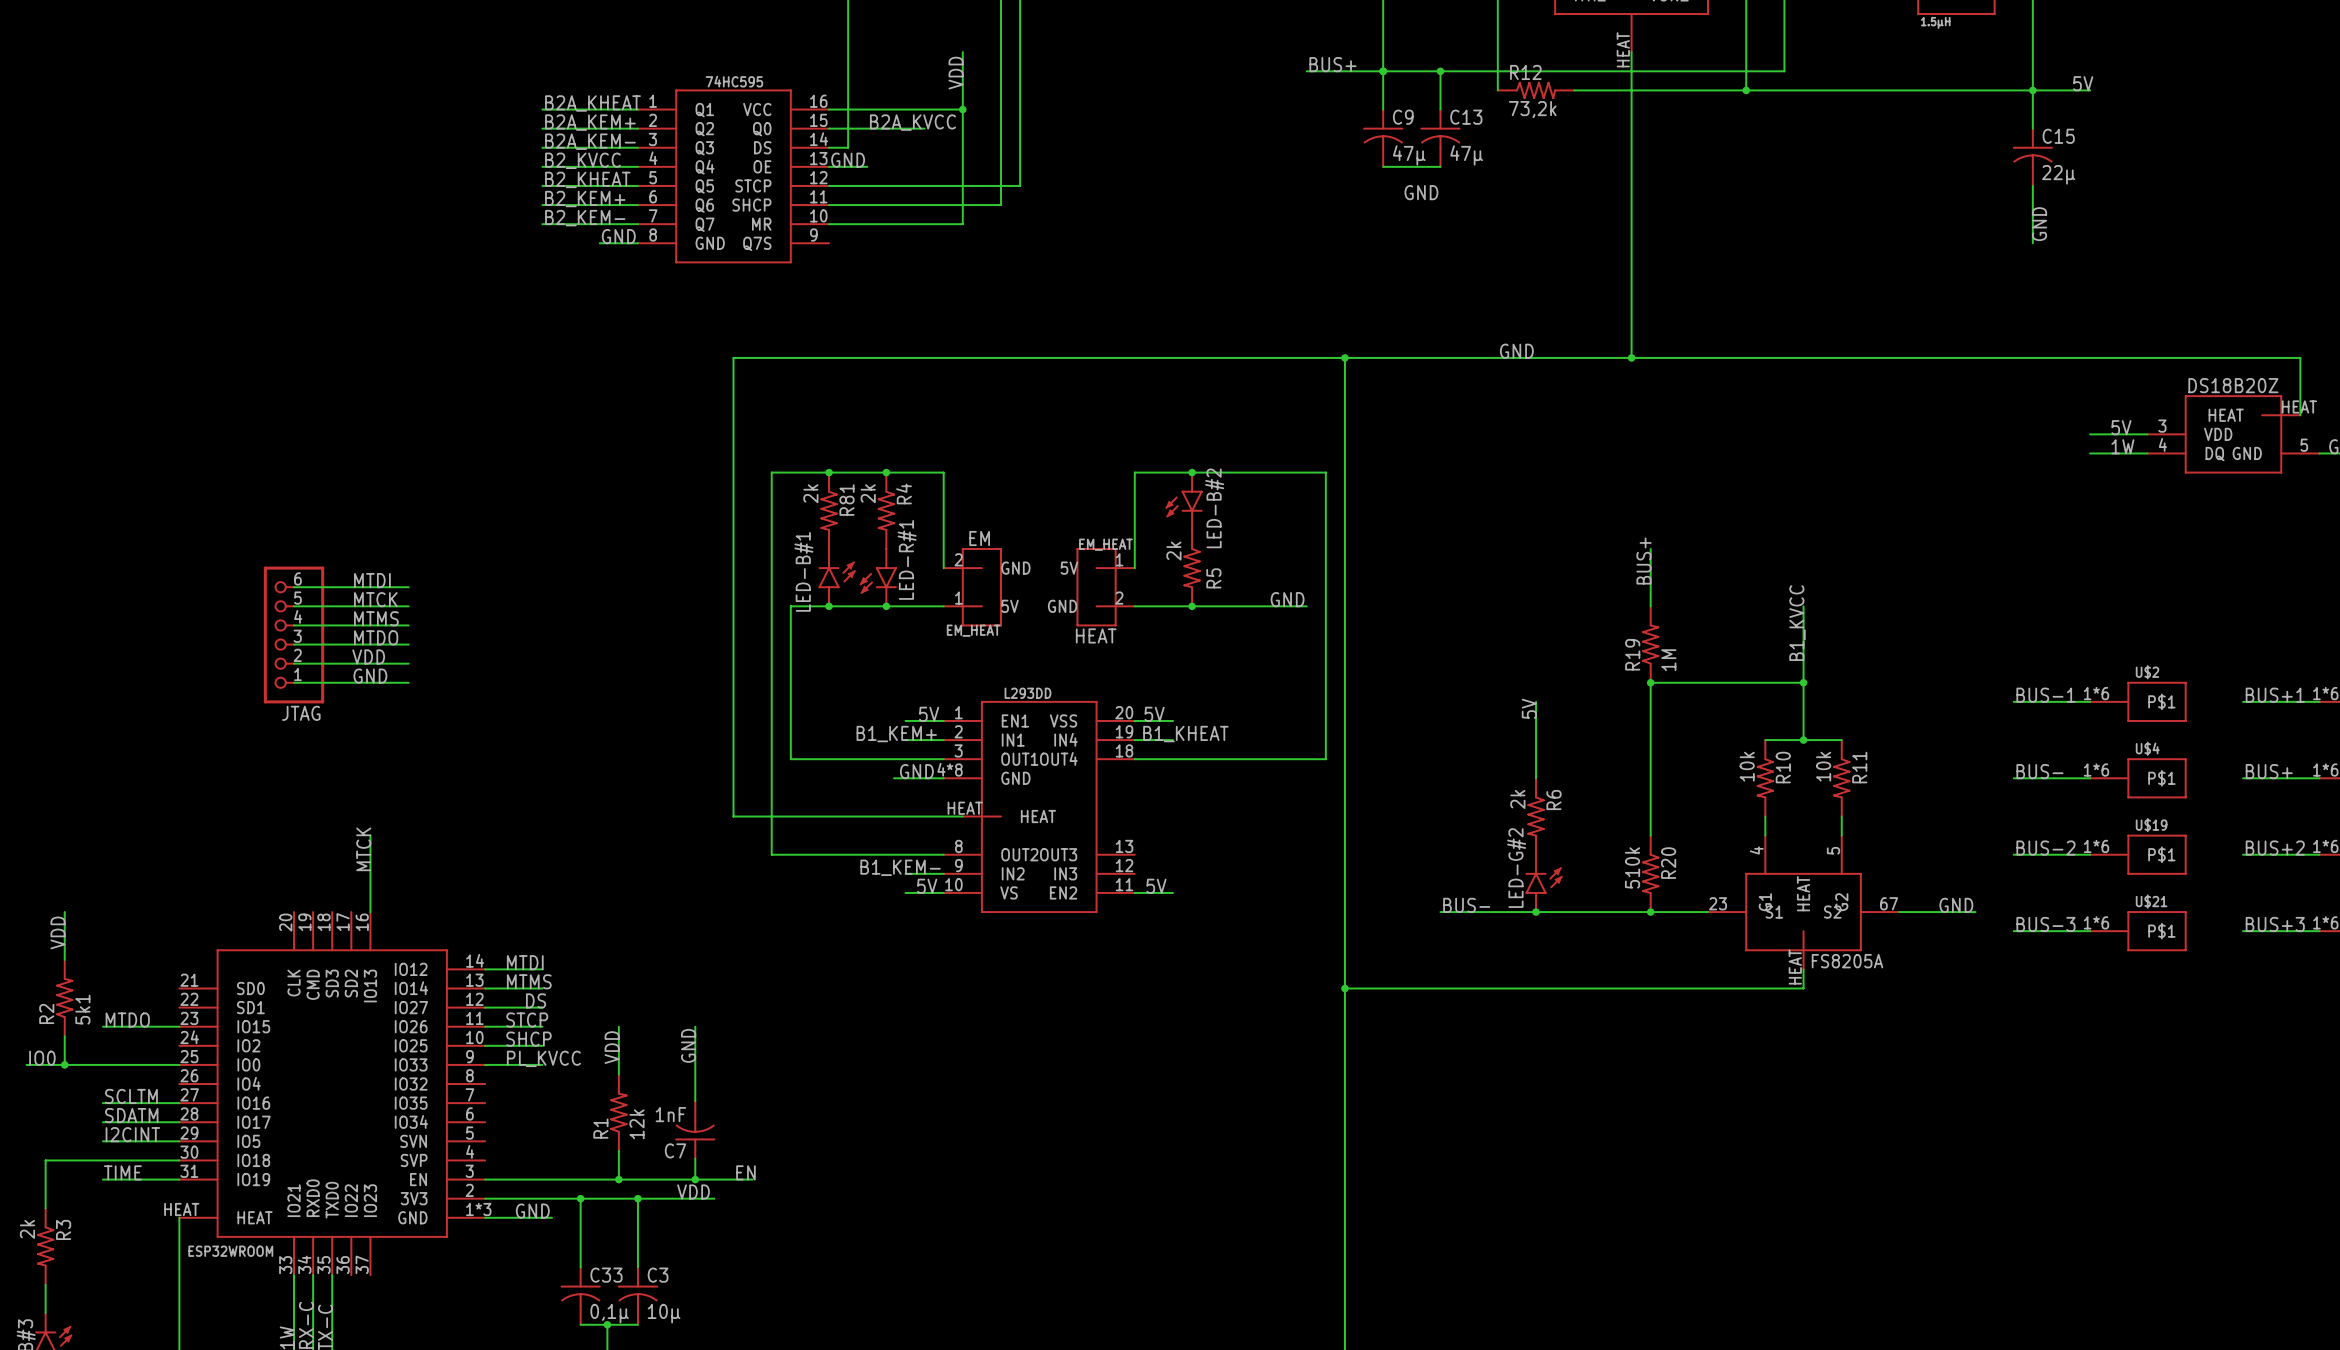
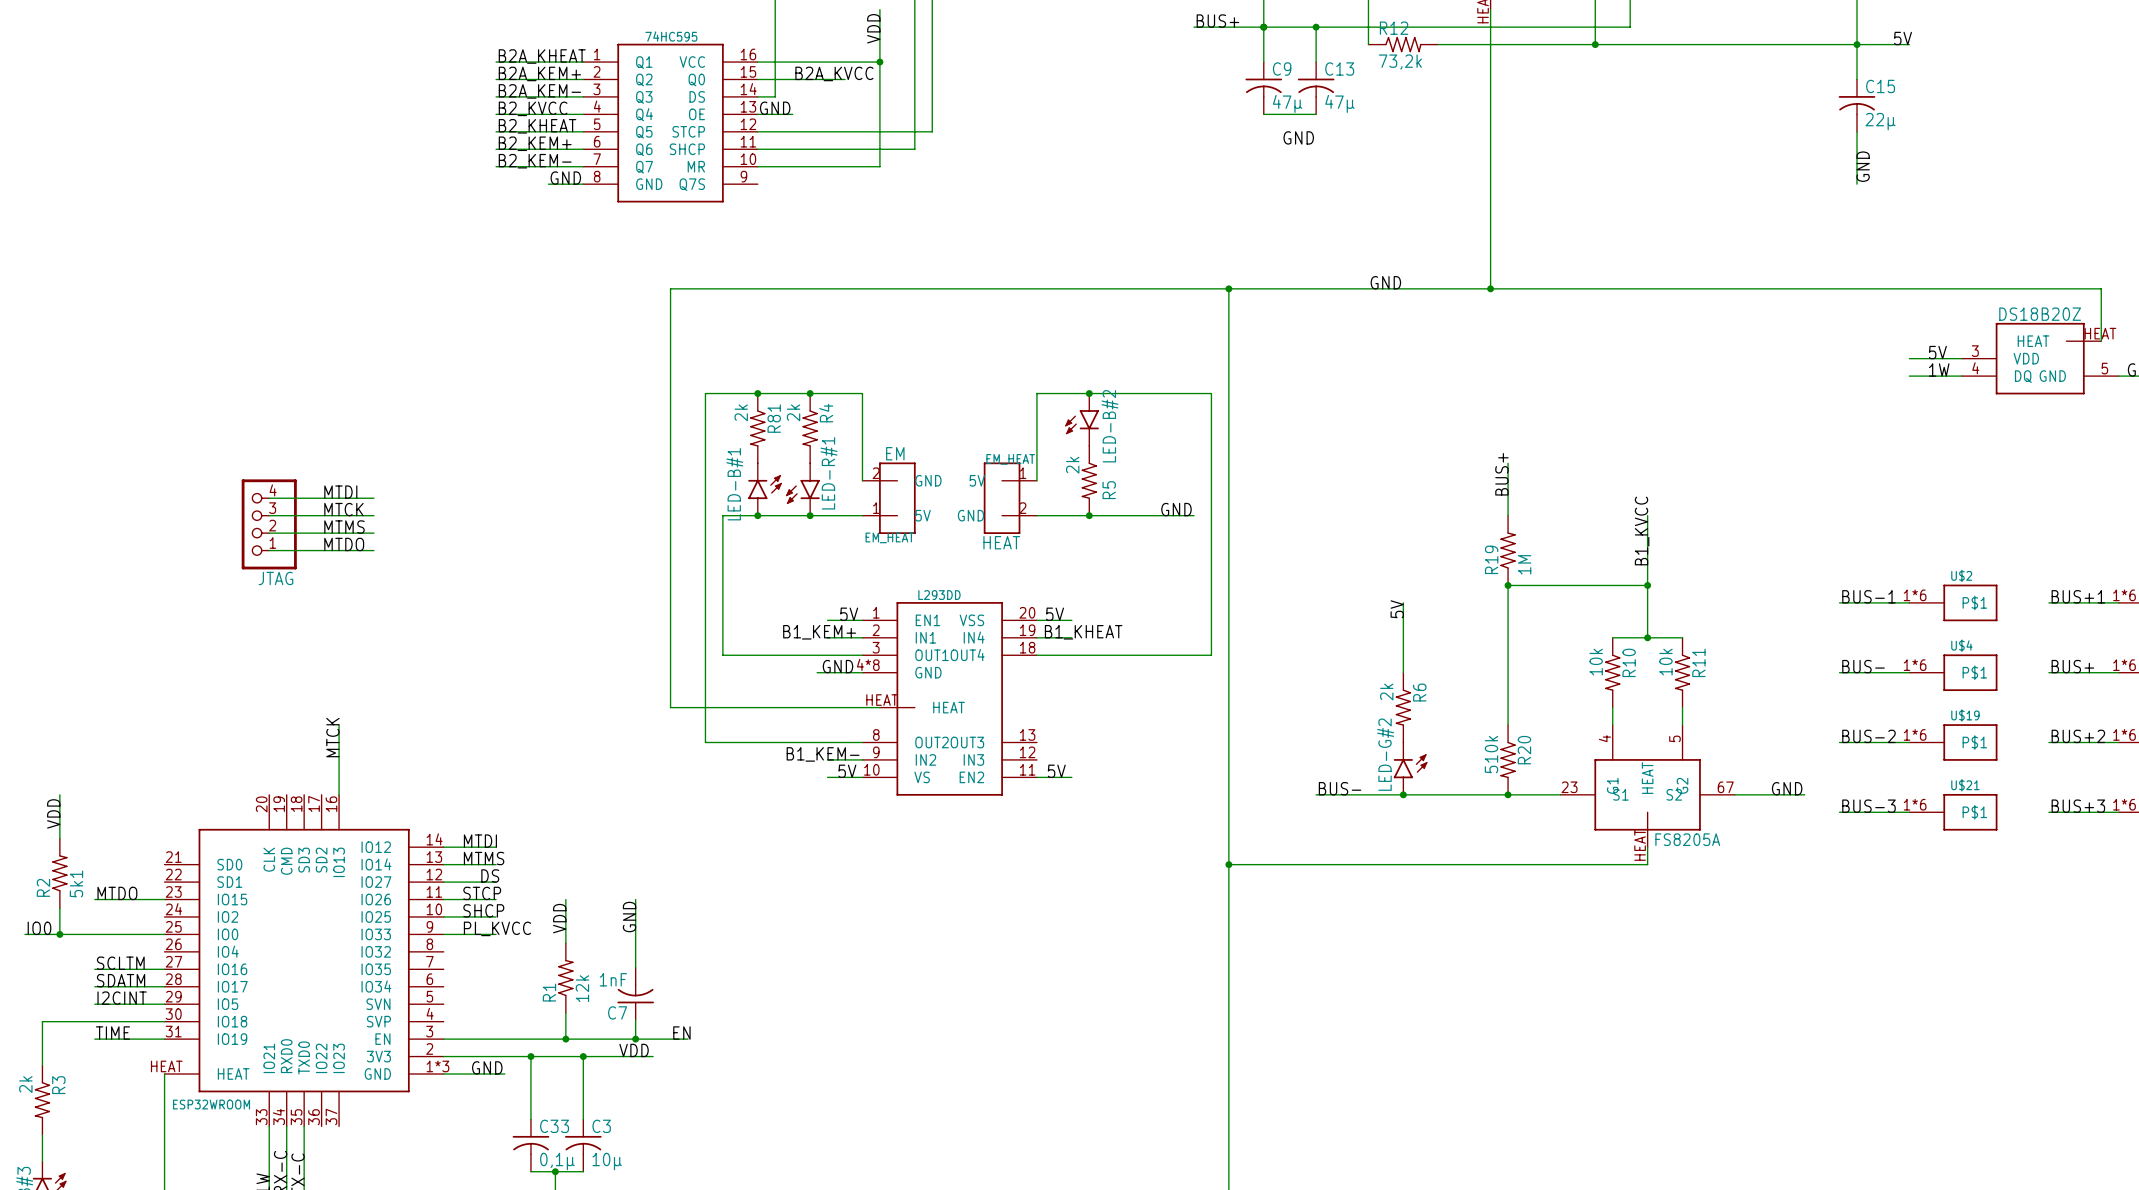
JTAG: none -> (269, 524)
JTAG: (294, 634) -> none
label: VDD (368, 656) -> none
wire: (294, 663) (408, 663) -> none
label: GND (370, 676) -> none
wire: (294, 682) (408, 682) -> none

